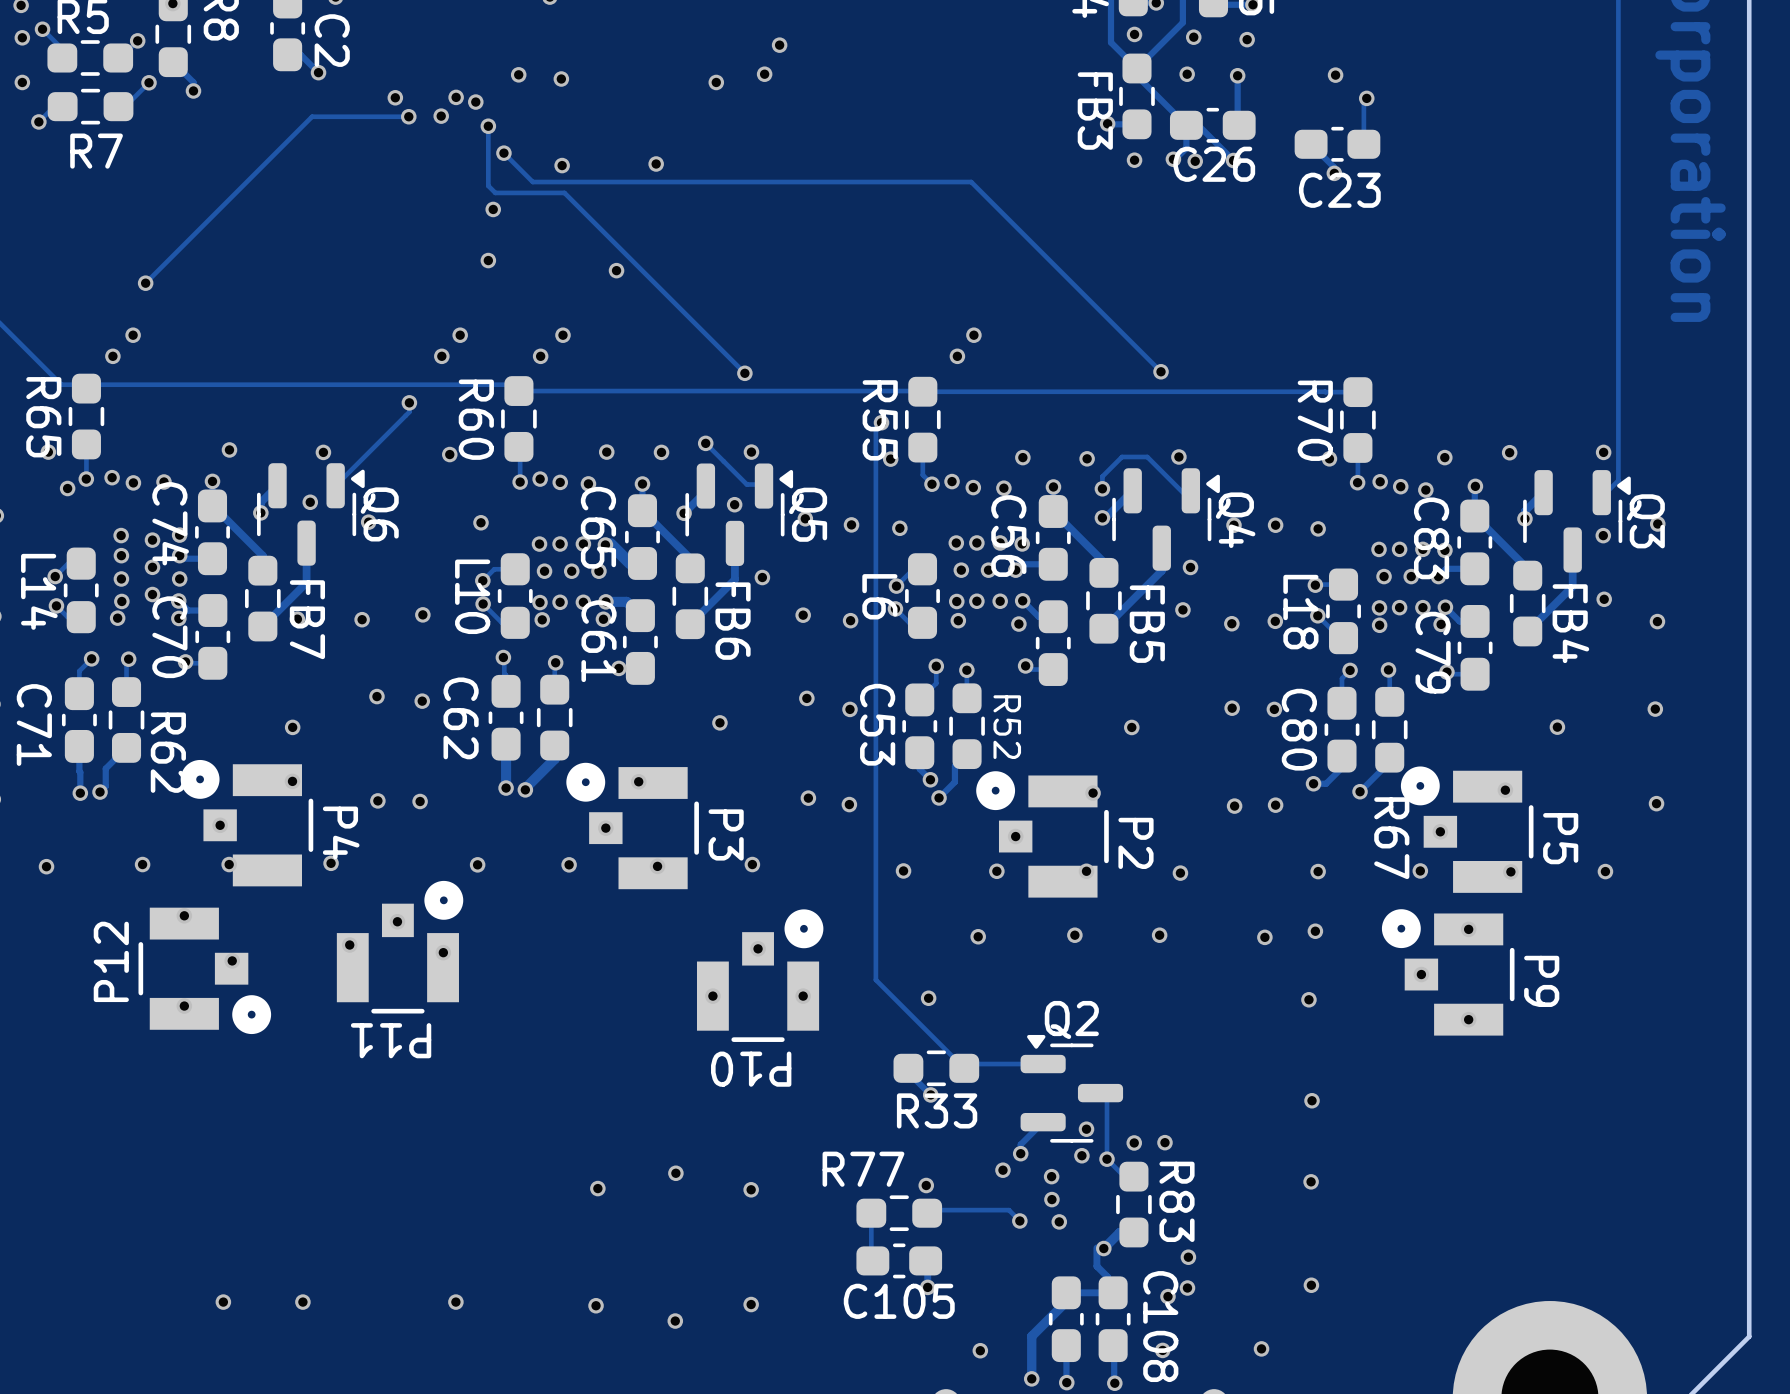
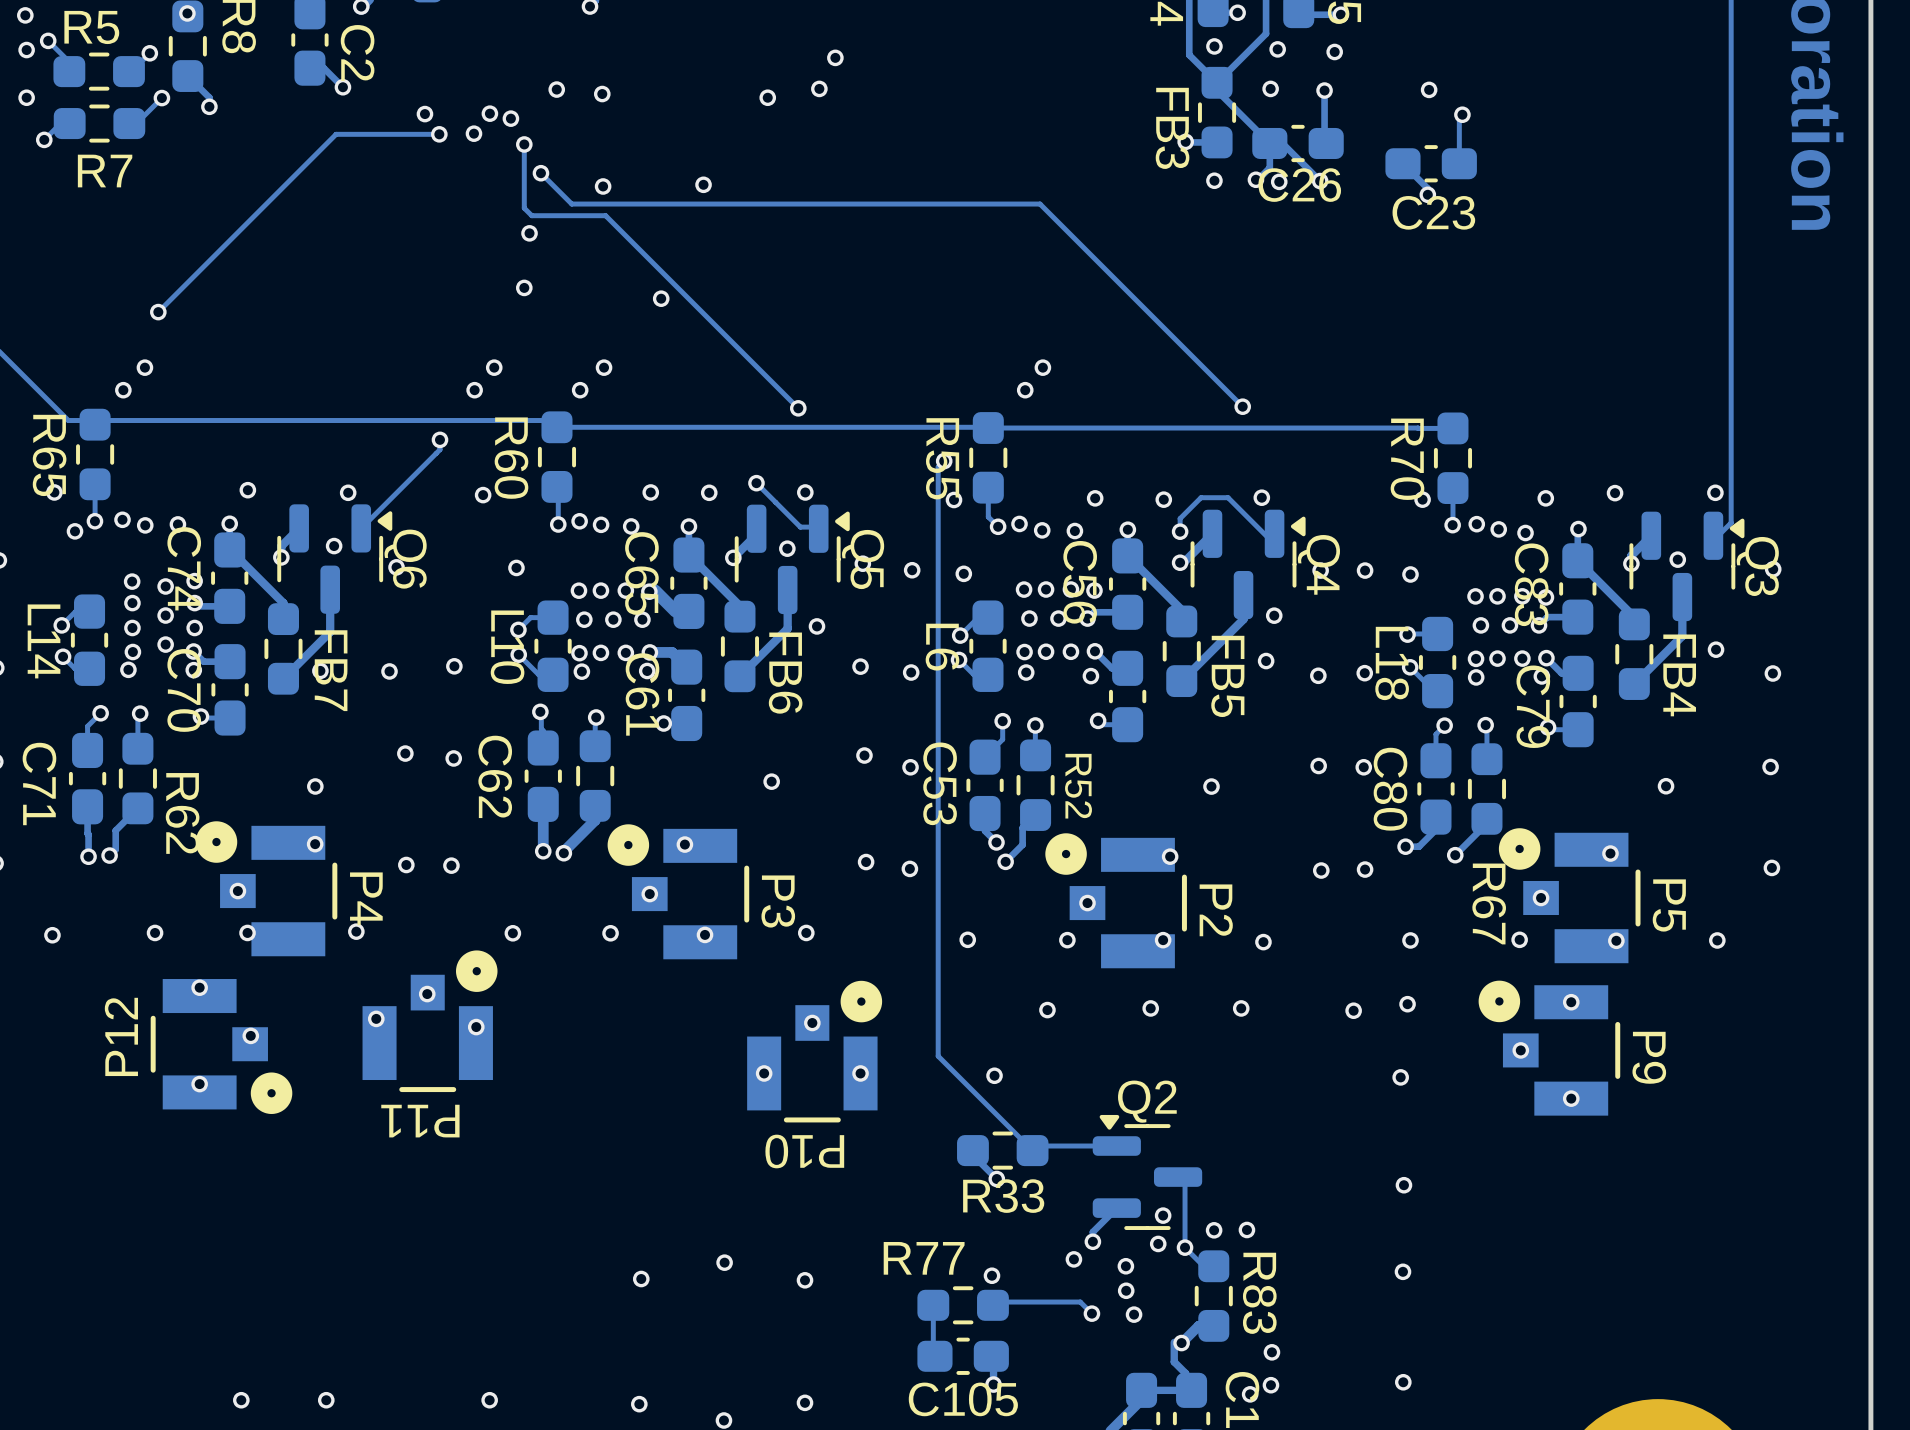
via position: (1603, 535) -> (1677, 559)

